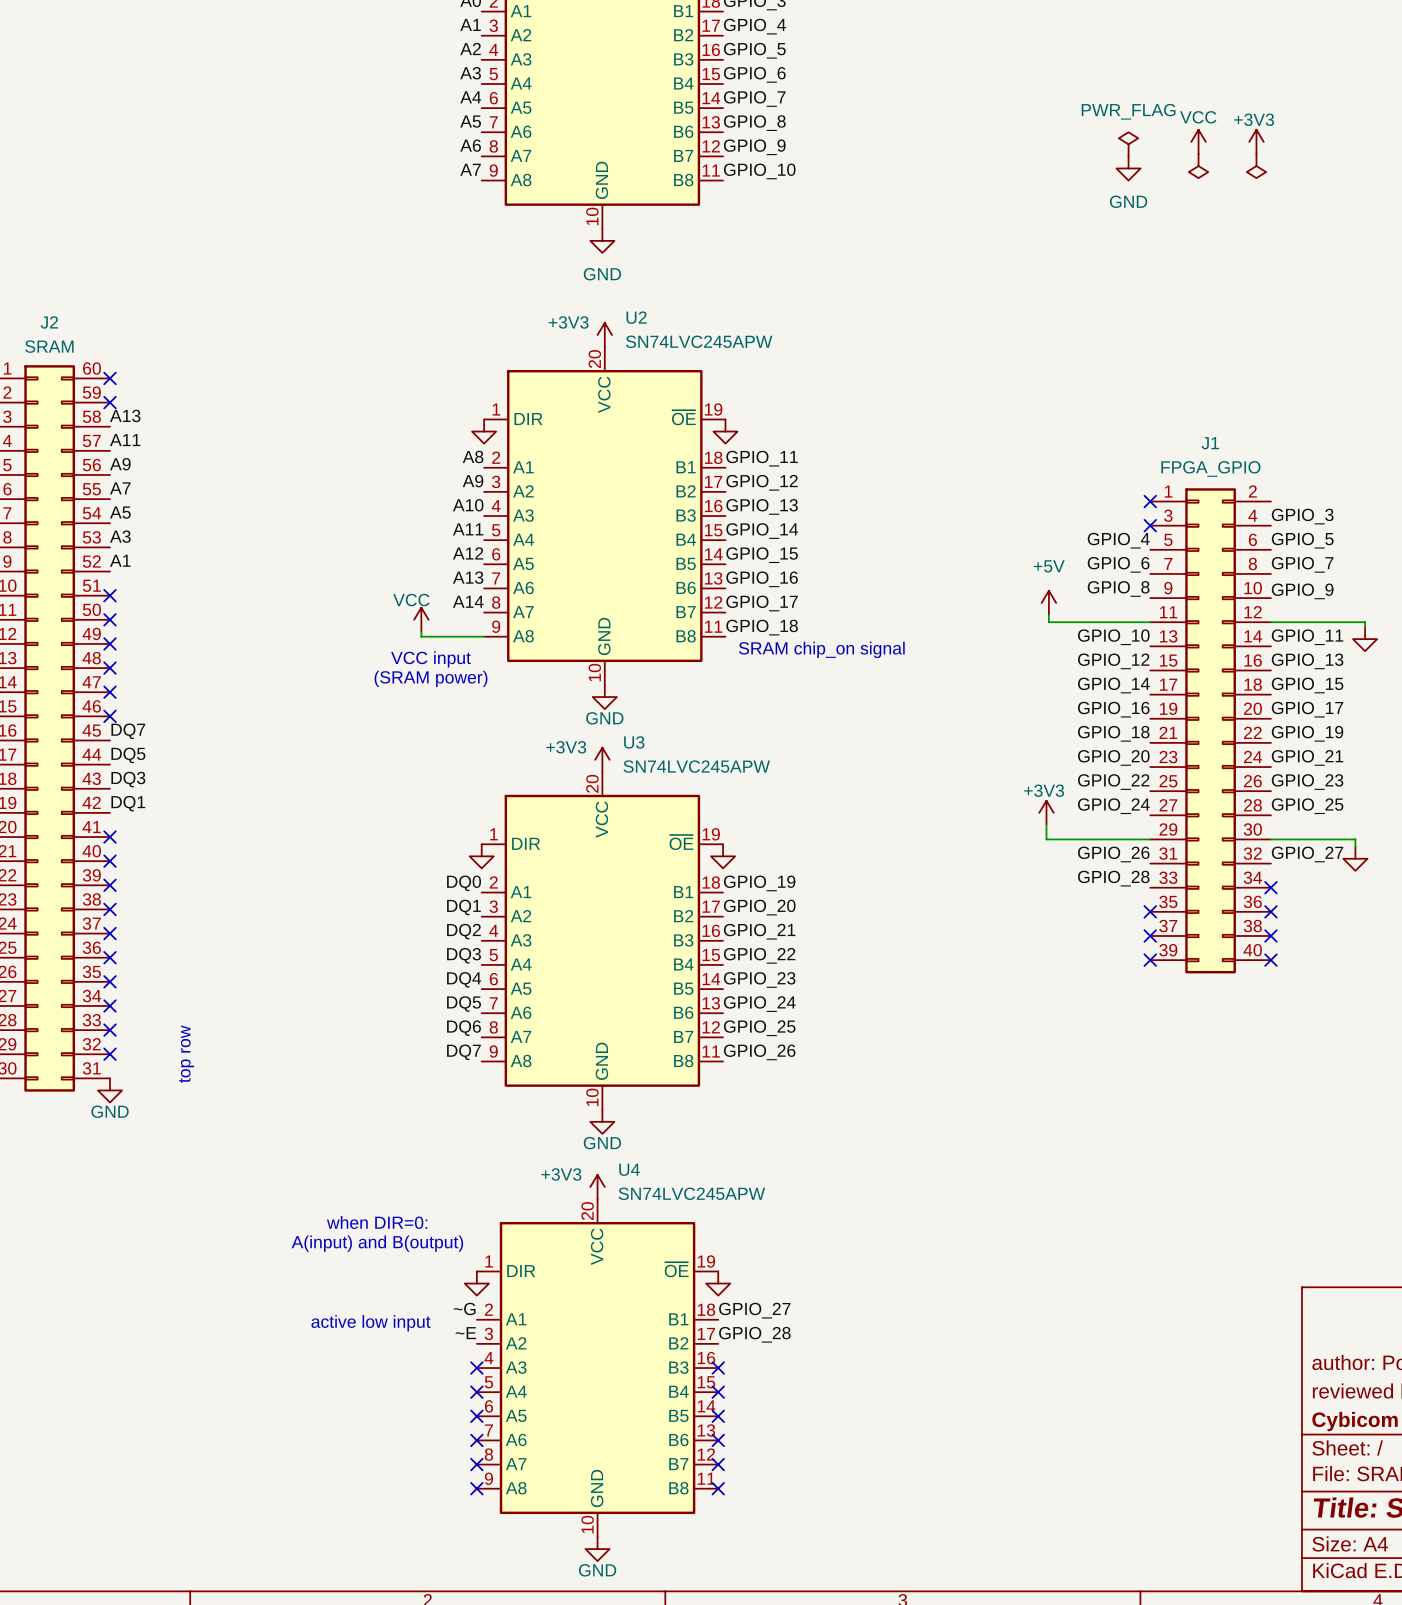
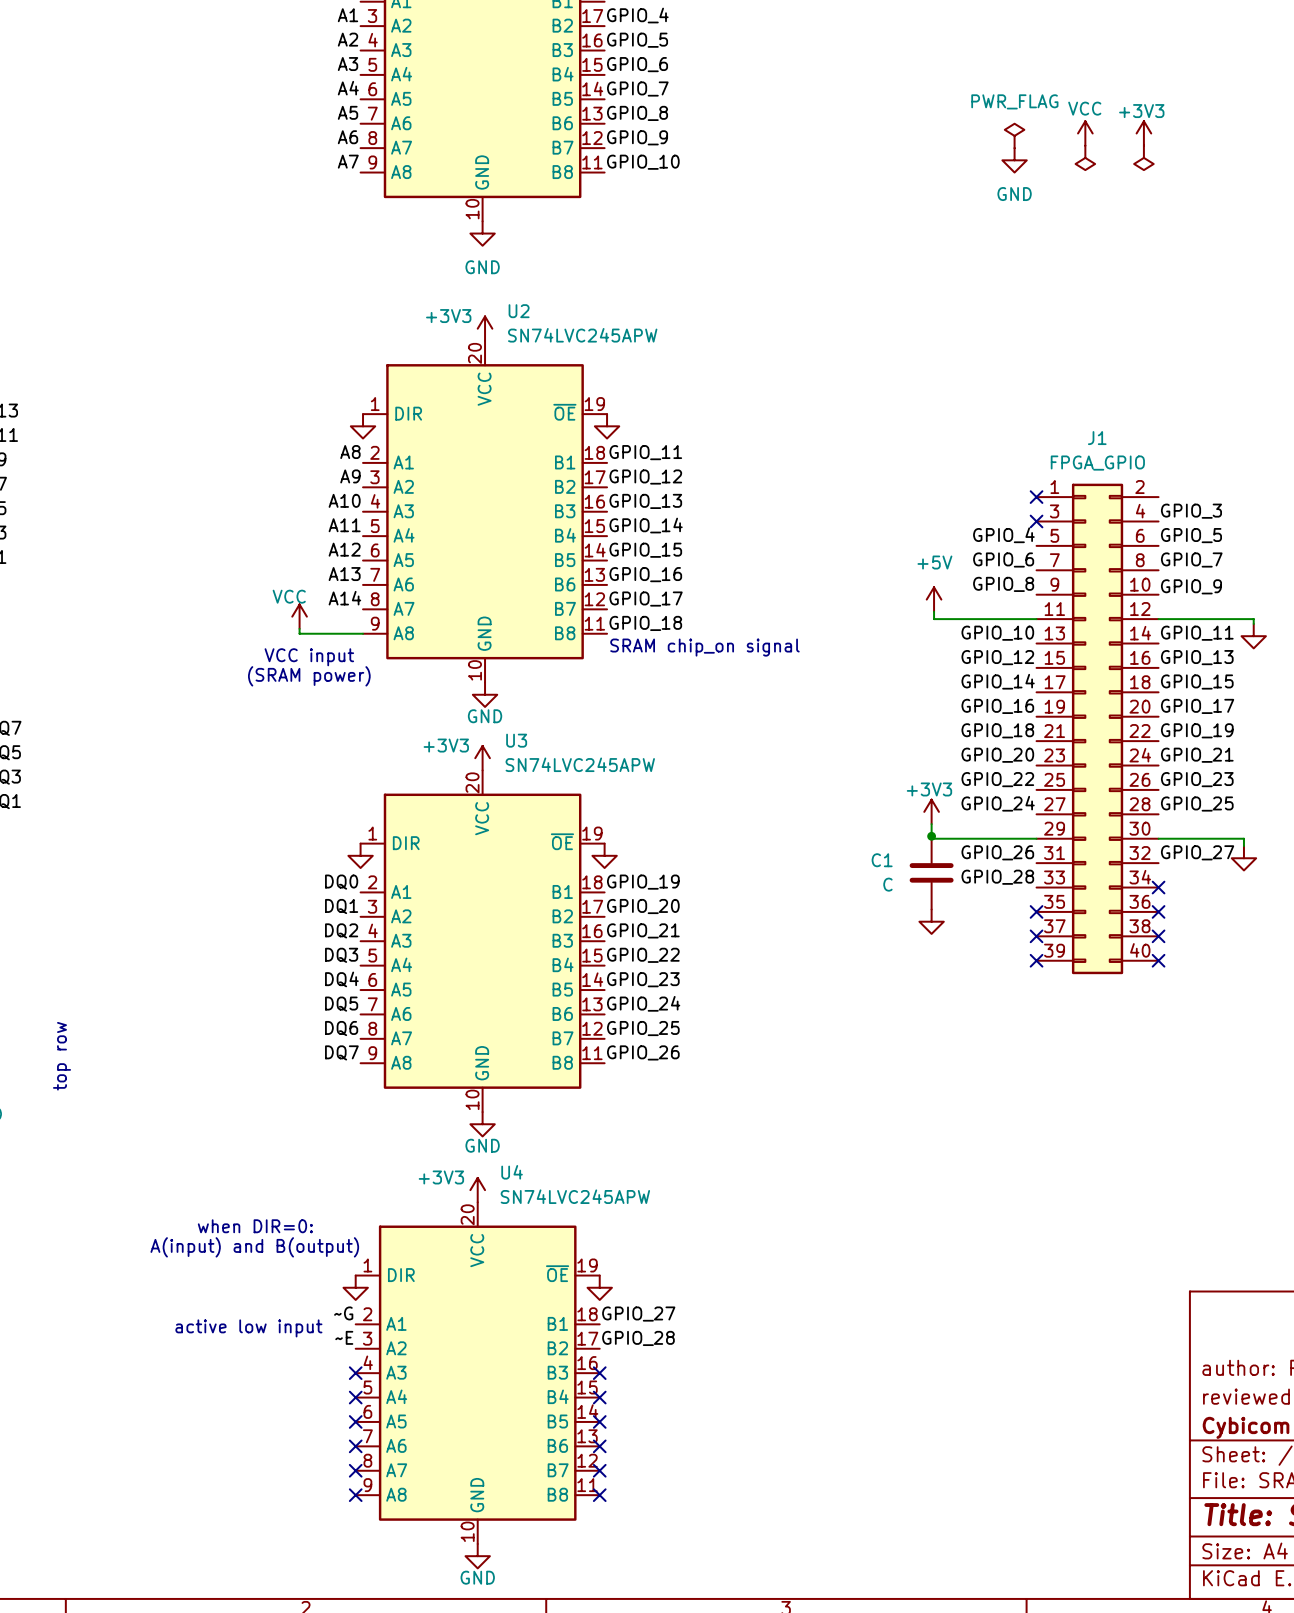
junction: none -> (931, 836)
C1: none -> C (931, 872)
power symbol: none -> (931, 921)

